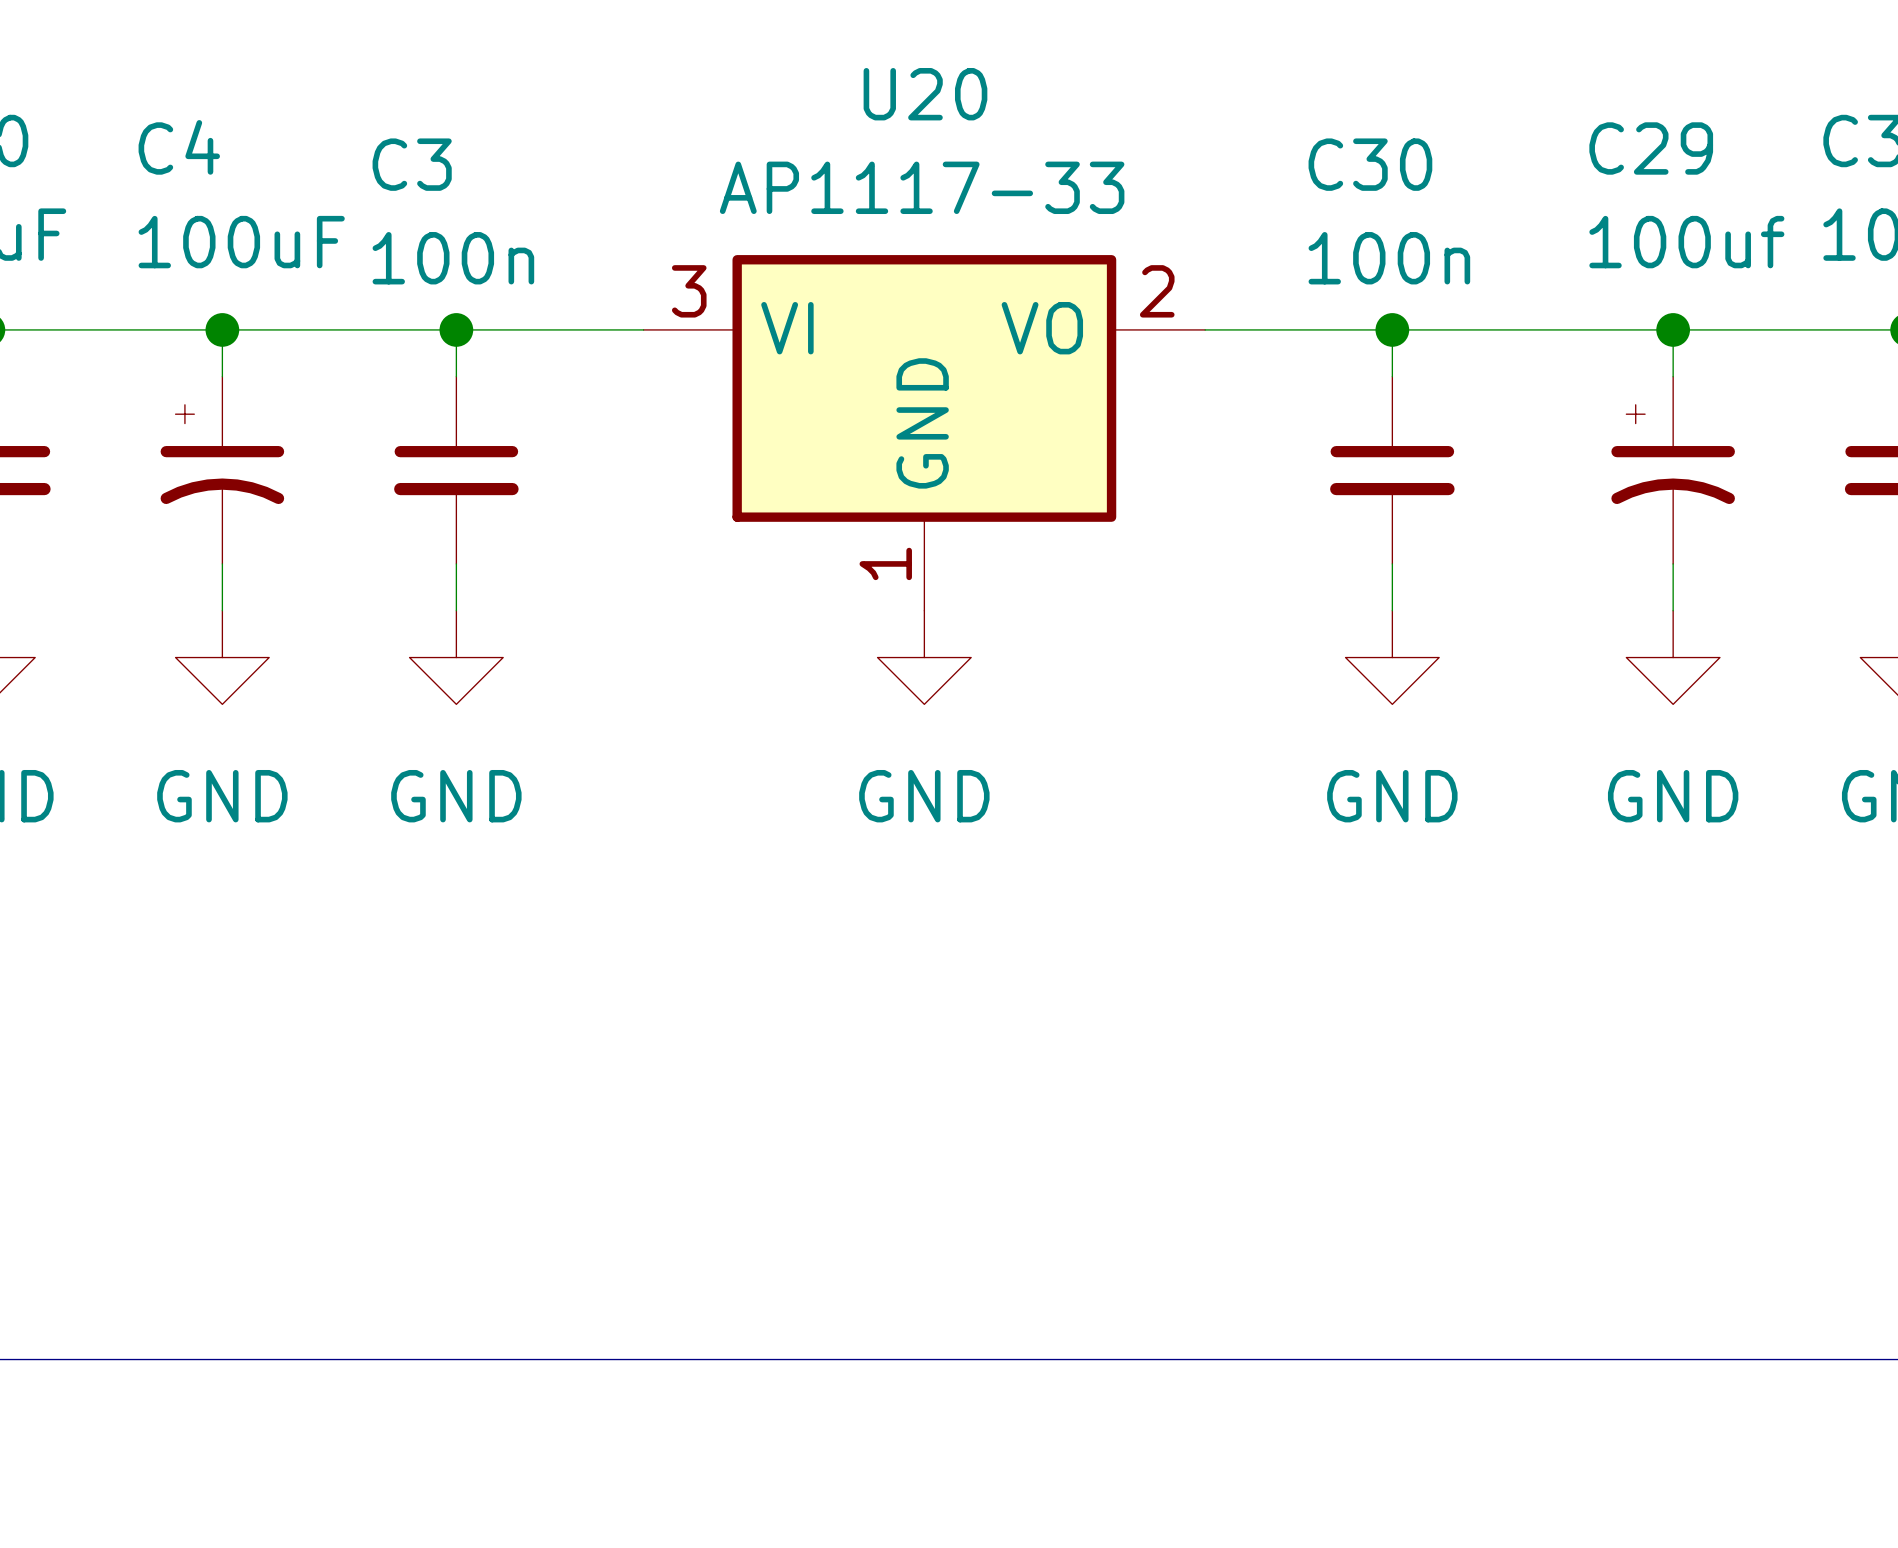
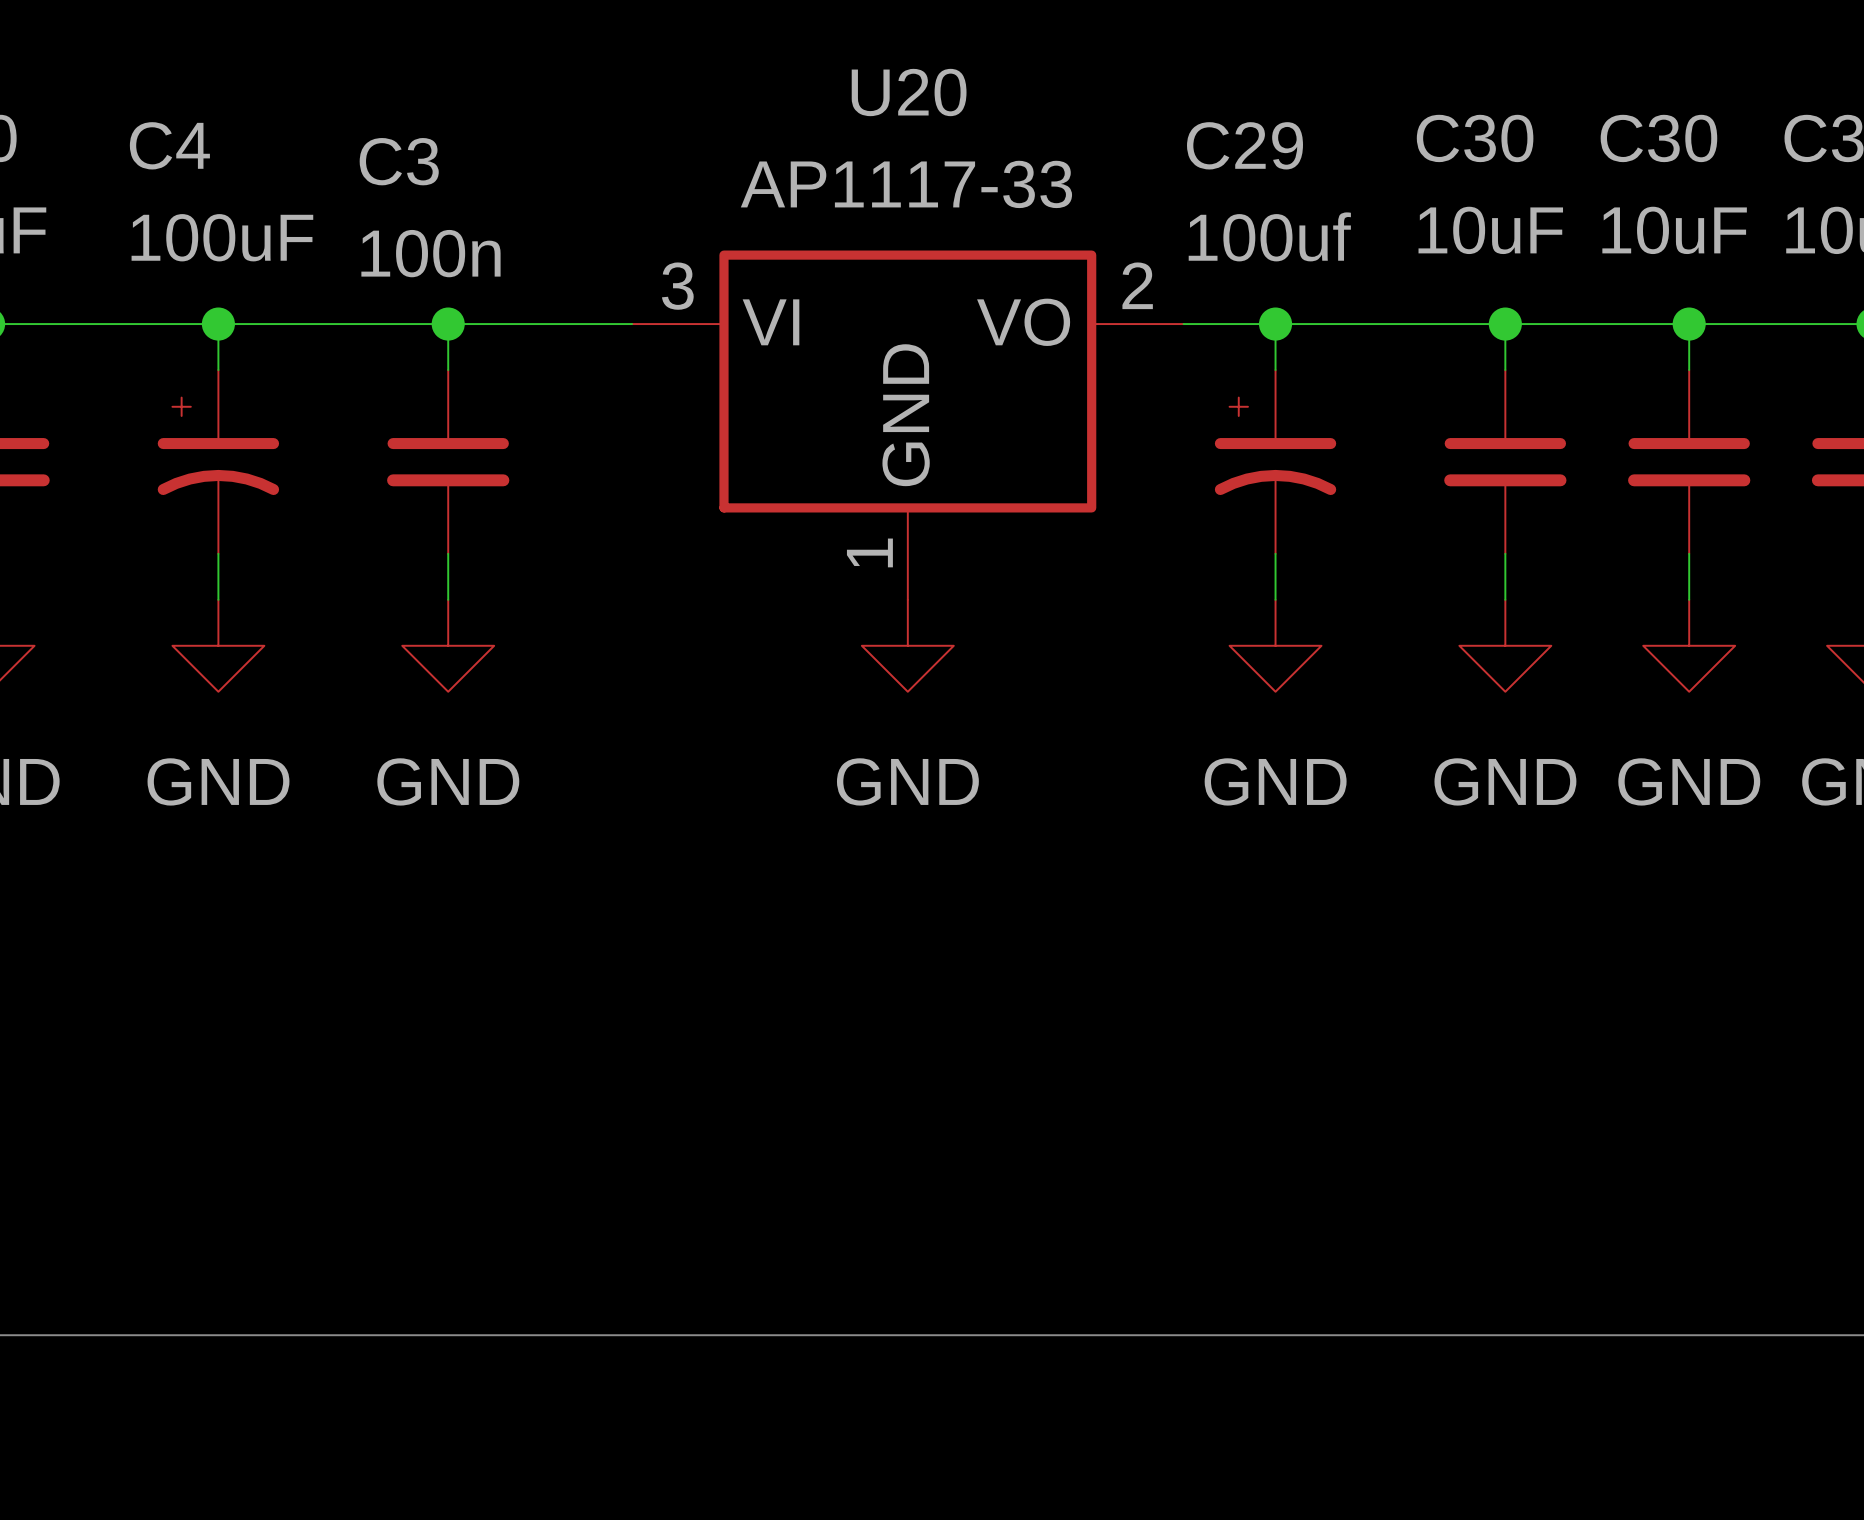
junction: none -> (1275, 324)
wire: (1392, 329) (1392, 376) -> (1275, 324) (1275, 370)
junction: (1392, 329) -> none
wire: none -> (1505, 324) (1505, 370)
junction: none -> (1505, 324)
wire: (1673, 329) (1673, 376) -> (1689, 324) (1689, 370)
junction position: (1673, 329) -> (1689, 324)
C30: 100n (1392, 470) -> none
C30: none -> 10uF (1505, 461)
C29 position: (1673, 470) -> (1275, 461)
C30: none -> 10uF (1689, 461)
wire: (1392, 563) (1392, 610) -> (1275, 553) (1275, 599)
wire: none -> (1505, 553) (1505, 599)
wire: (1673, 563) (1673, 610) -> (1689, 553) (1689, 599)
power symbol: none -> GND (1275, 645)
power symbol: GND (1392, 657) -> none
power symbol: none -> GND (1505, 645)
power symbol position: GND (1673, 657) -> GND (1689, 645)

